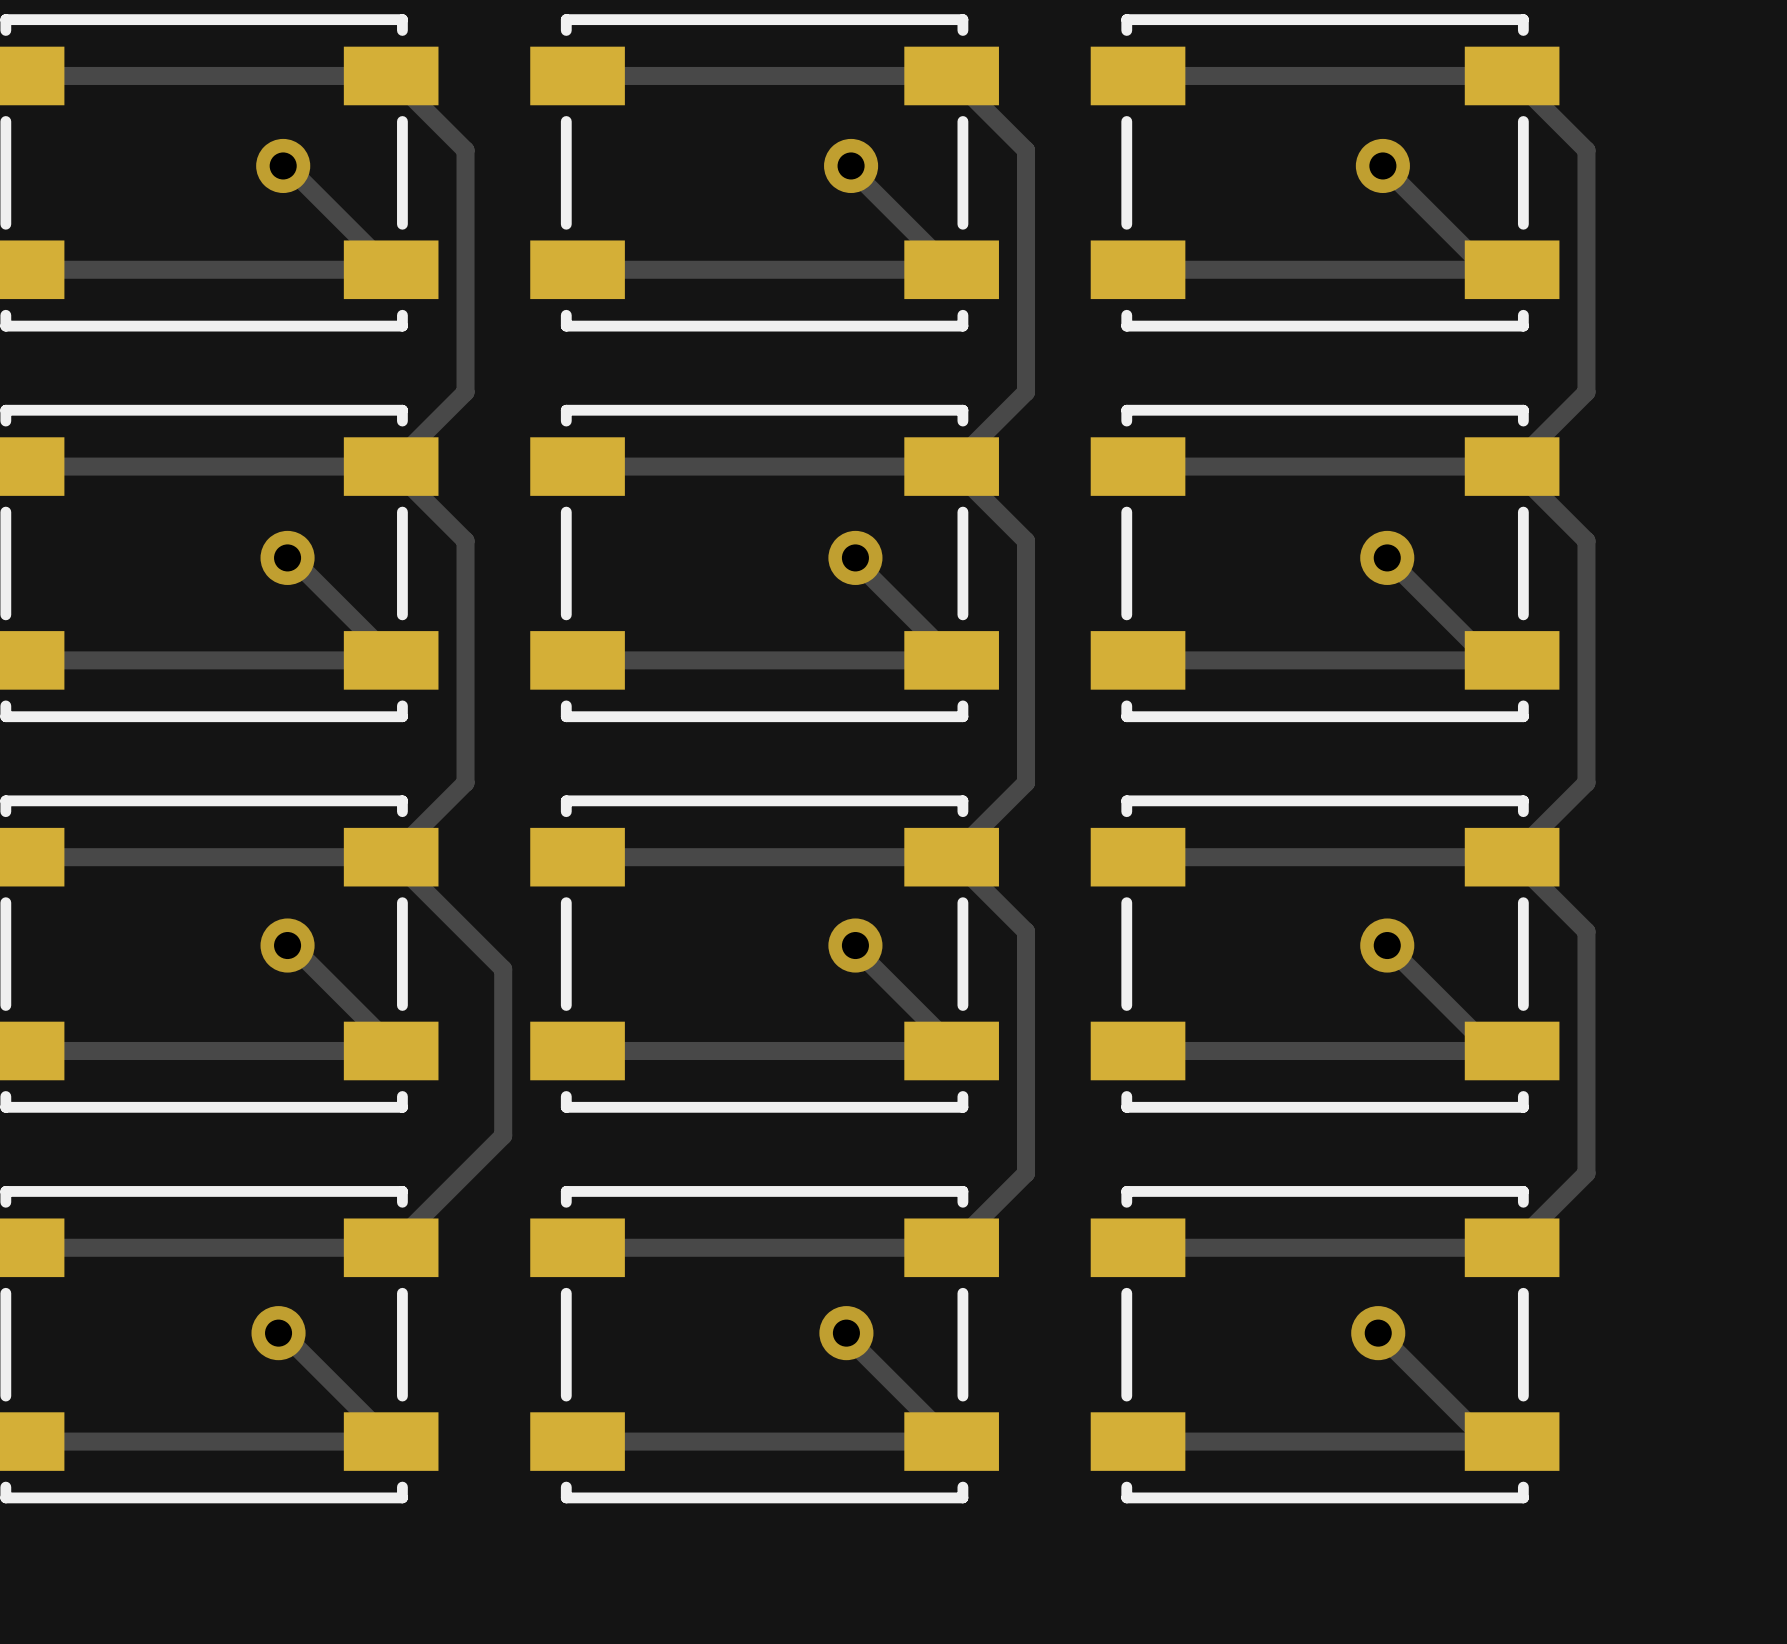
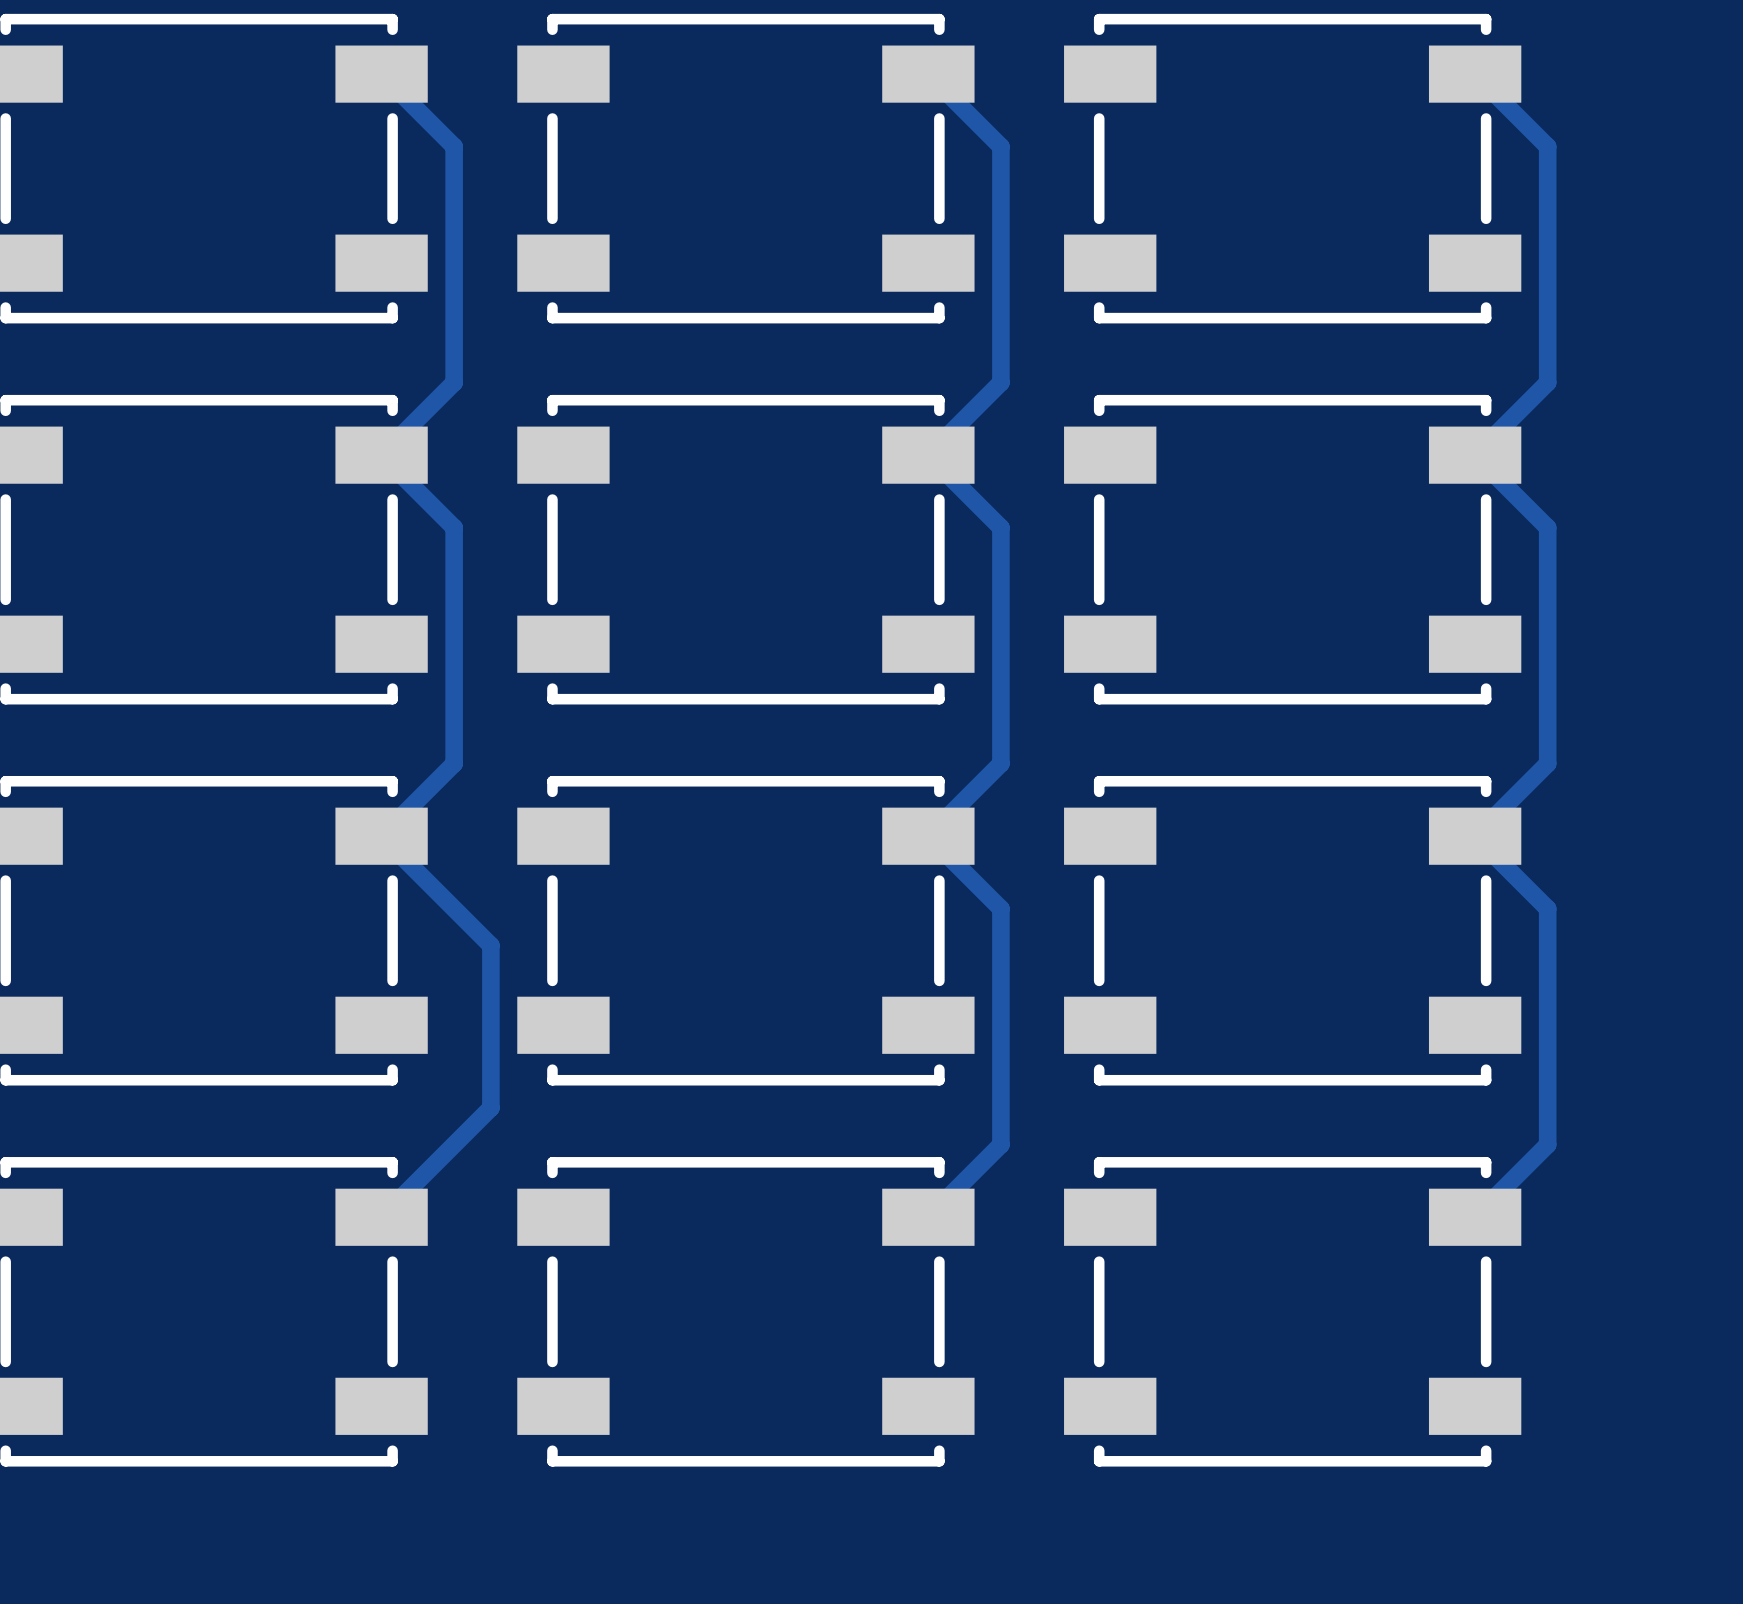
track: (17, 75) (391, 75) -> none
track: (577, 75) (951, 75) -> none
track: (1138, 75) (1512, 75) -> none
track: (283, 165) (287, 165) (391, 269) (17, 269) -> none
via: (283, 165) -> none
track: (851, 165) (851, 169) (951, 269) (577, 269) -> none
via: (851, 165) -> none
track: (1382, 165) (1486, 269) -> none
via: (1382, 165) -> none
track: (1138, 269) (1512, 269) -> none
track: (17, 466) (391, 466) -> none
track: (577, 466) (951, 466) -> none
track: (1138, 466) (1512, 466) -> none
track: (287, 557) (291, 557) (395, 661) -> none
via: (287, 557) -> none
track: (855, 557) (855, 561) (956, 661) -> none
via: (855, 557) -> none
track: (1387, 557) (1491, 661) -> none
via: (1387, 557) -> none
track: (17, 660) (391, 660) -> none
track: (577, 660) (951, 660) -> none
track: (1138, 660) (1512, 660) -> none
track: (17, 857) (391, 857) -> none
track: (577, 857) (951, 857) -> none
track: (1138, 857) (1512, 857) -> none
track: (287, 945) (291, 945) (395, 1049) -> none
via: (287, 945) -> none
track: (855, 945) (855, 948) (956, 1049) -> none
via: (855, 945) -> none
track: (1387, 945) (1491, 1049) -> none
via: (1387, 945) -> none
track: (17, 1050) (391, 1050) -> none
track: (577, 1050) (951, 1050) -> none
track: (1138, 1050) (1512, 1050) -> none
track: (17, 1247) (391, 1247) -> none
track: (577, 1247) (951, 1247) -> none
track: (1138, 1247) (1512, 1247) -> none
track: (278, 1333) (282, 1333) (386, 1436) -> none
via: (278, 1333) -> none
track: (846, 1333) (846, 1336) (946, 1436) -> none
via: (846, 1333) -> none
track: (1378, 1333) (1482, 1436) -> none
via: (1378, 1333) -> none
track: (17, 1441) (391, 1441) -> none
track: (577, 1441) (951, 1441) -> none
track: (1138, 1441) (1512, 1441) -> none

